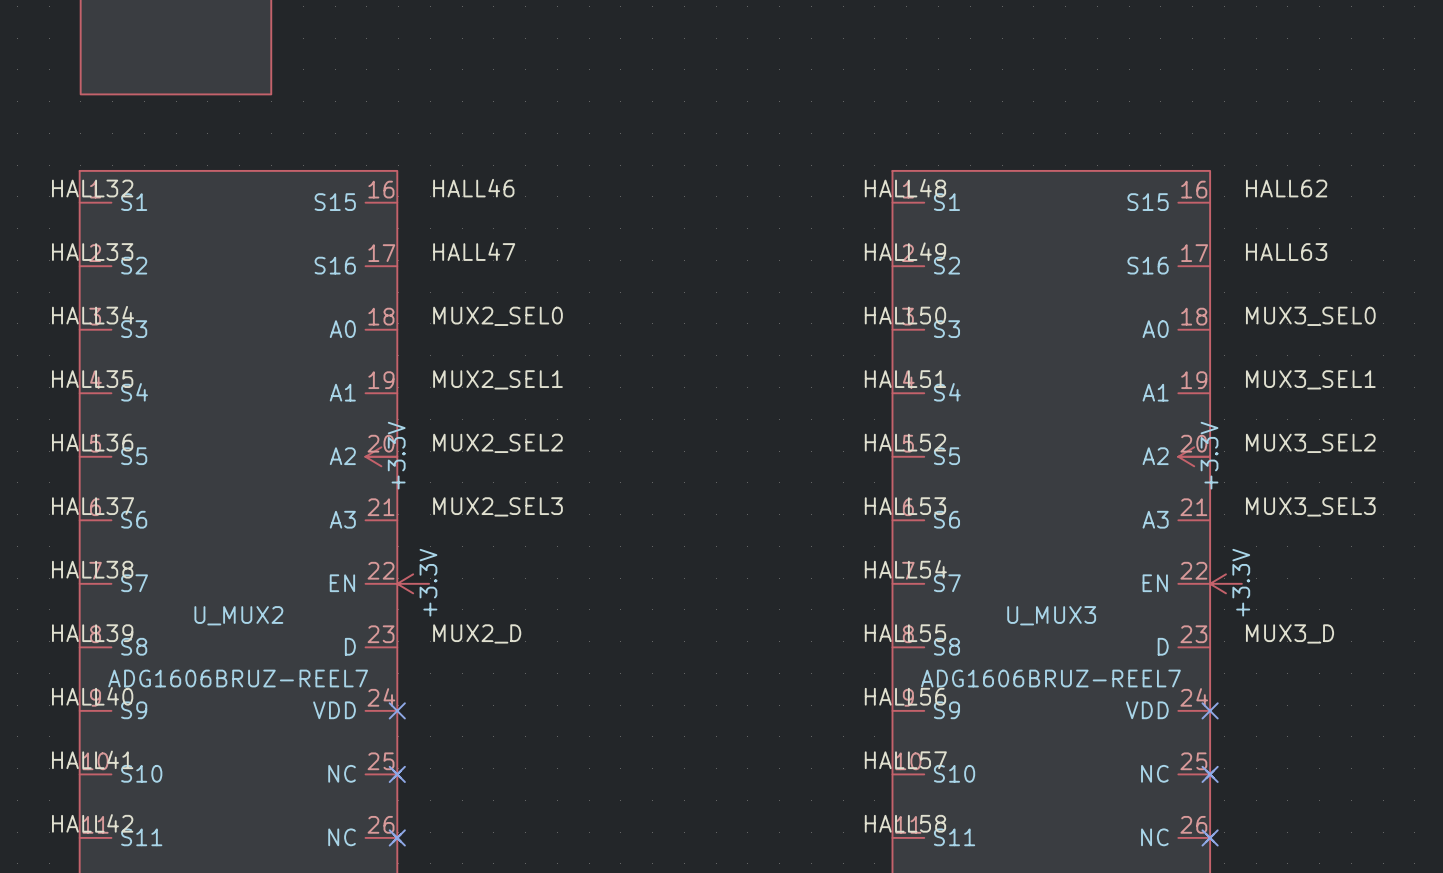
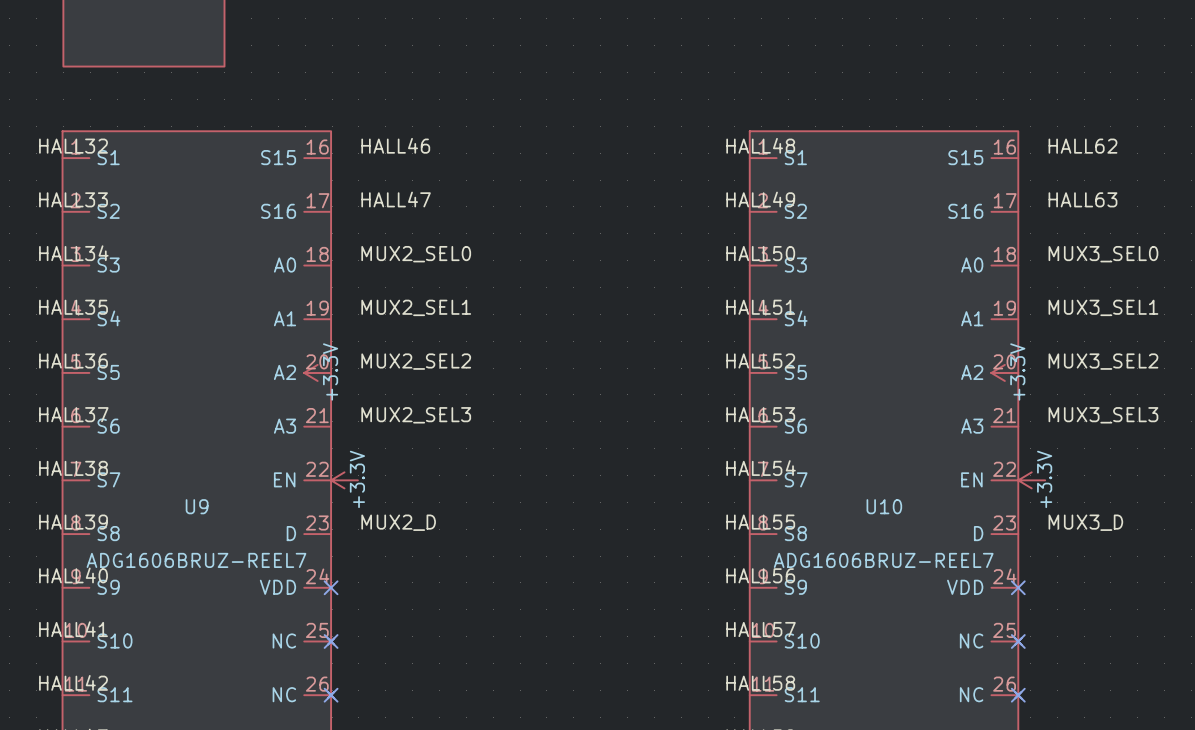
U_MUX2 name: U_MUX2 (238, 615) -> U9 (197, 506)
U_MUX3 name: U_MUX3 (1051, 615) -> U10 (884, 506)

